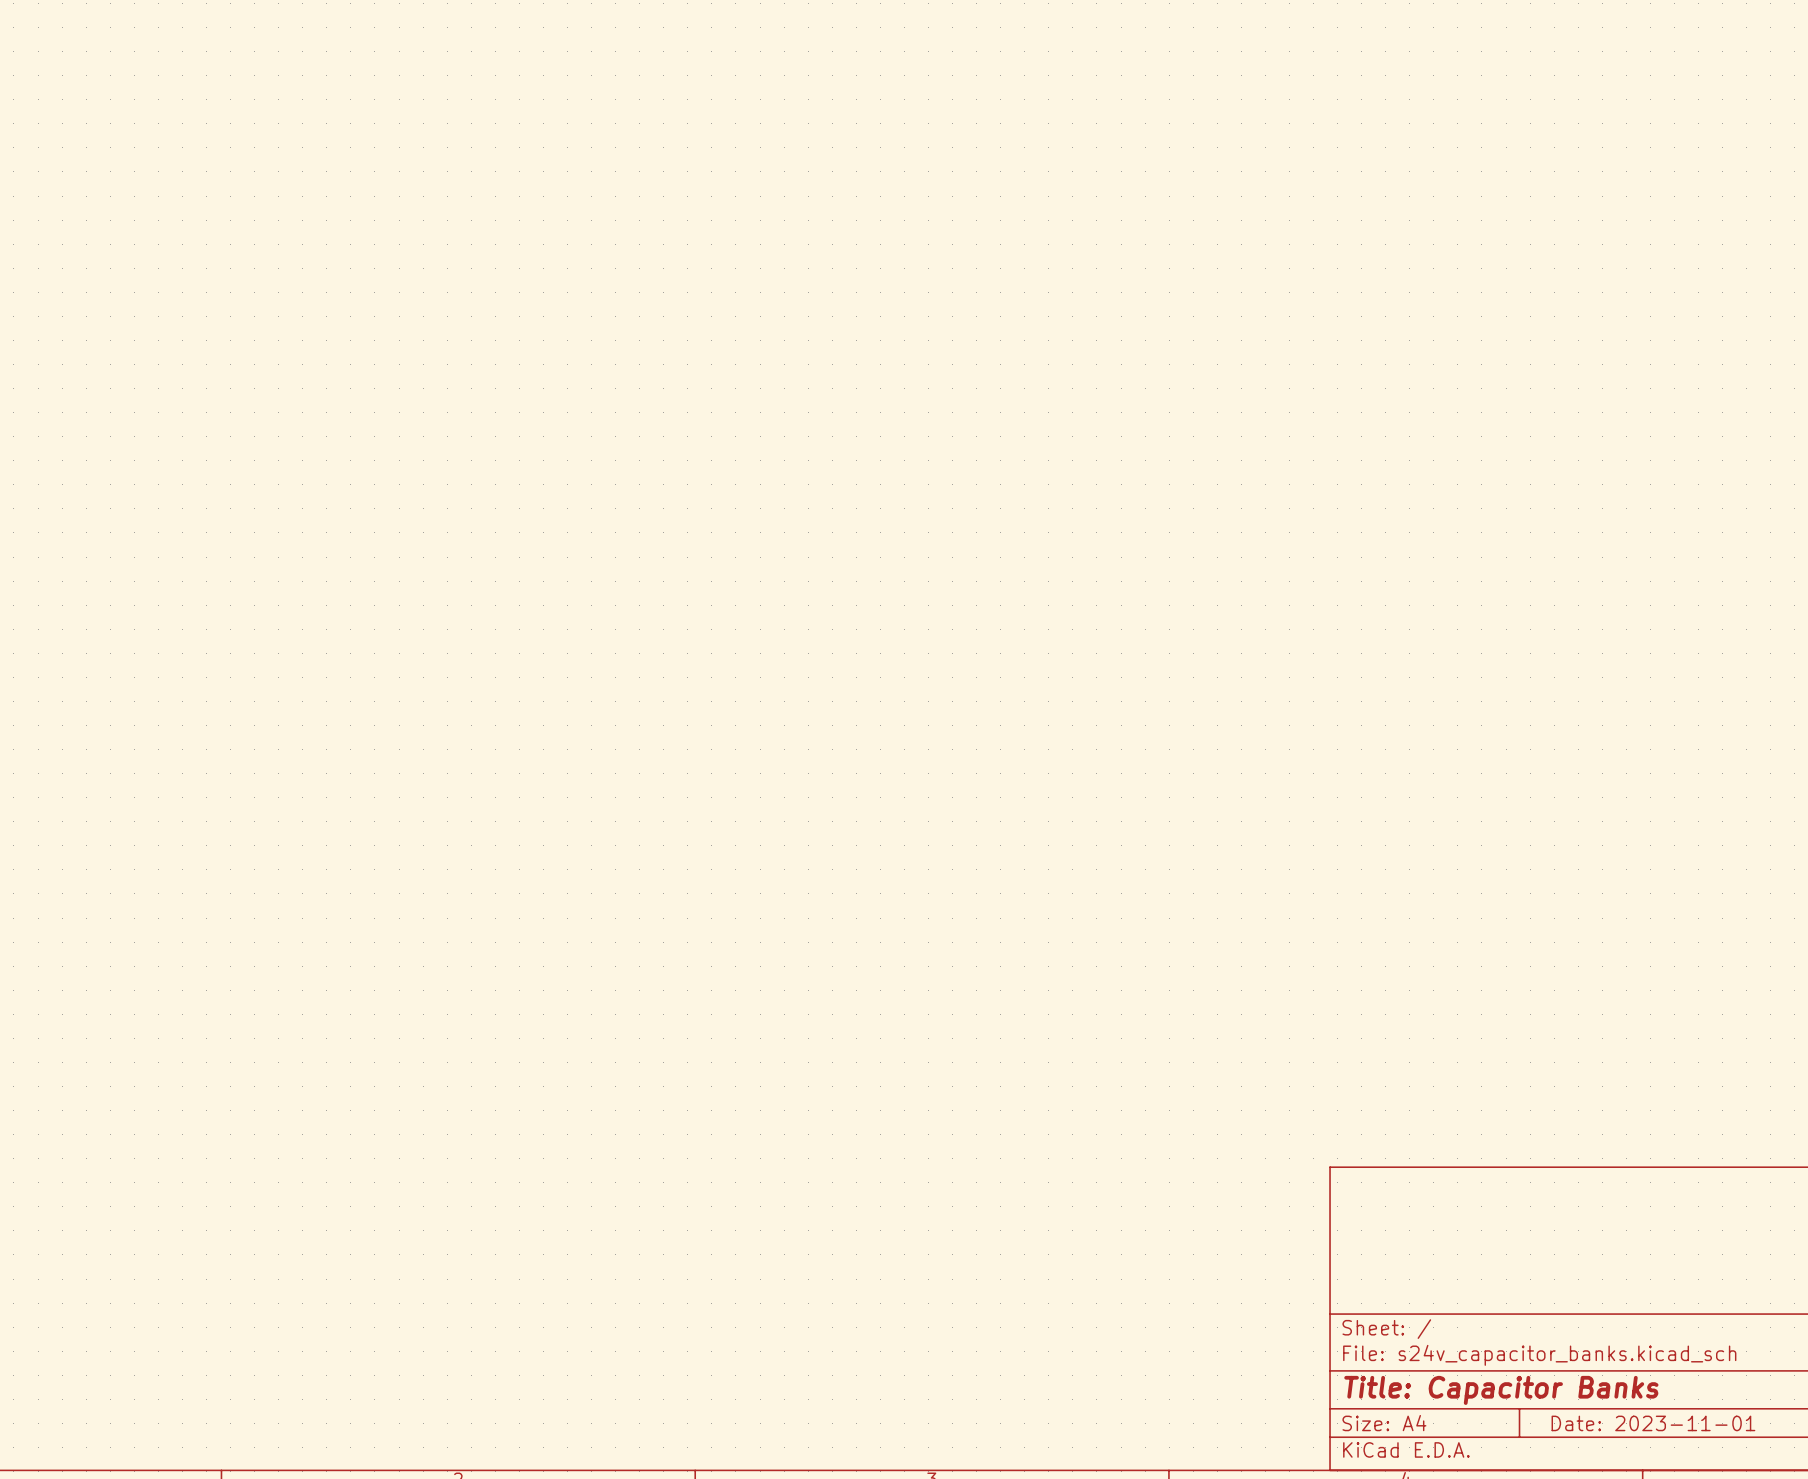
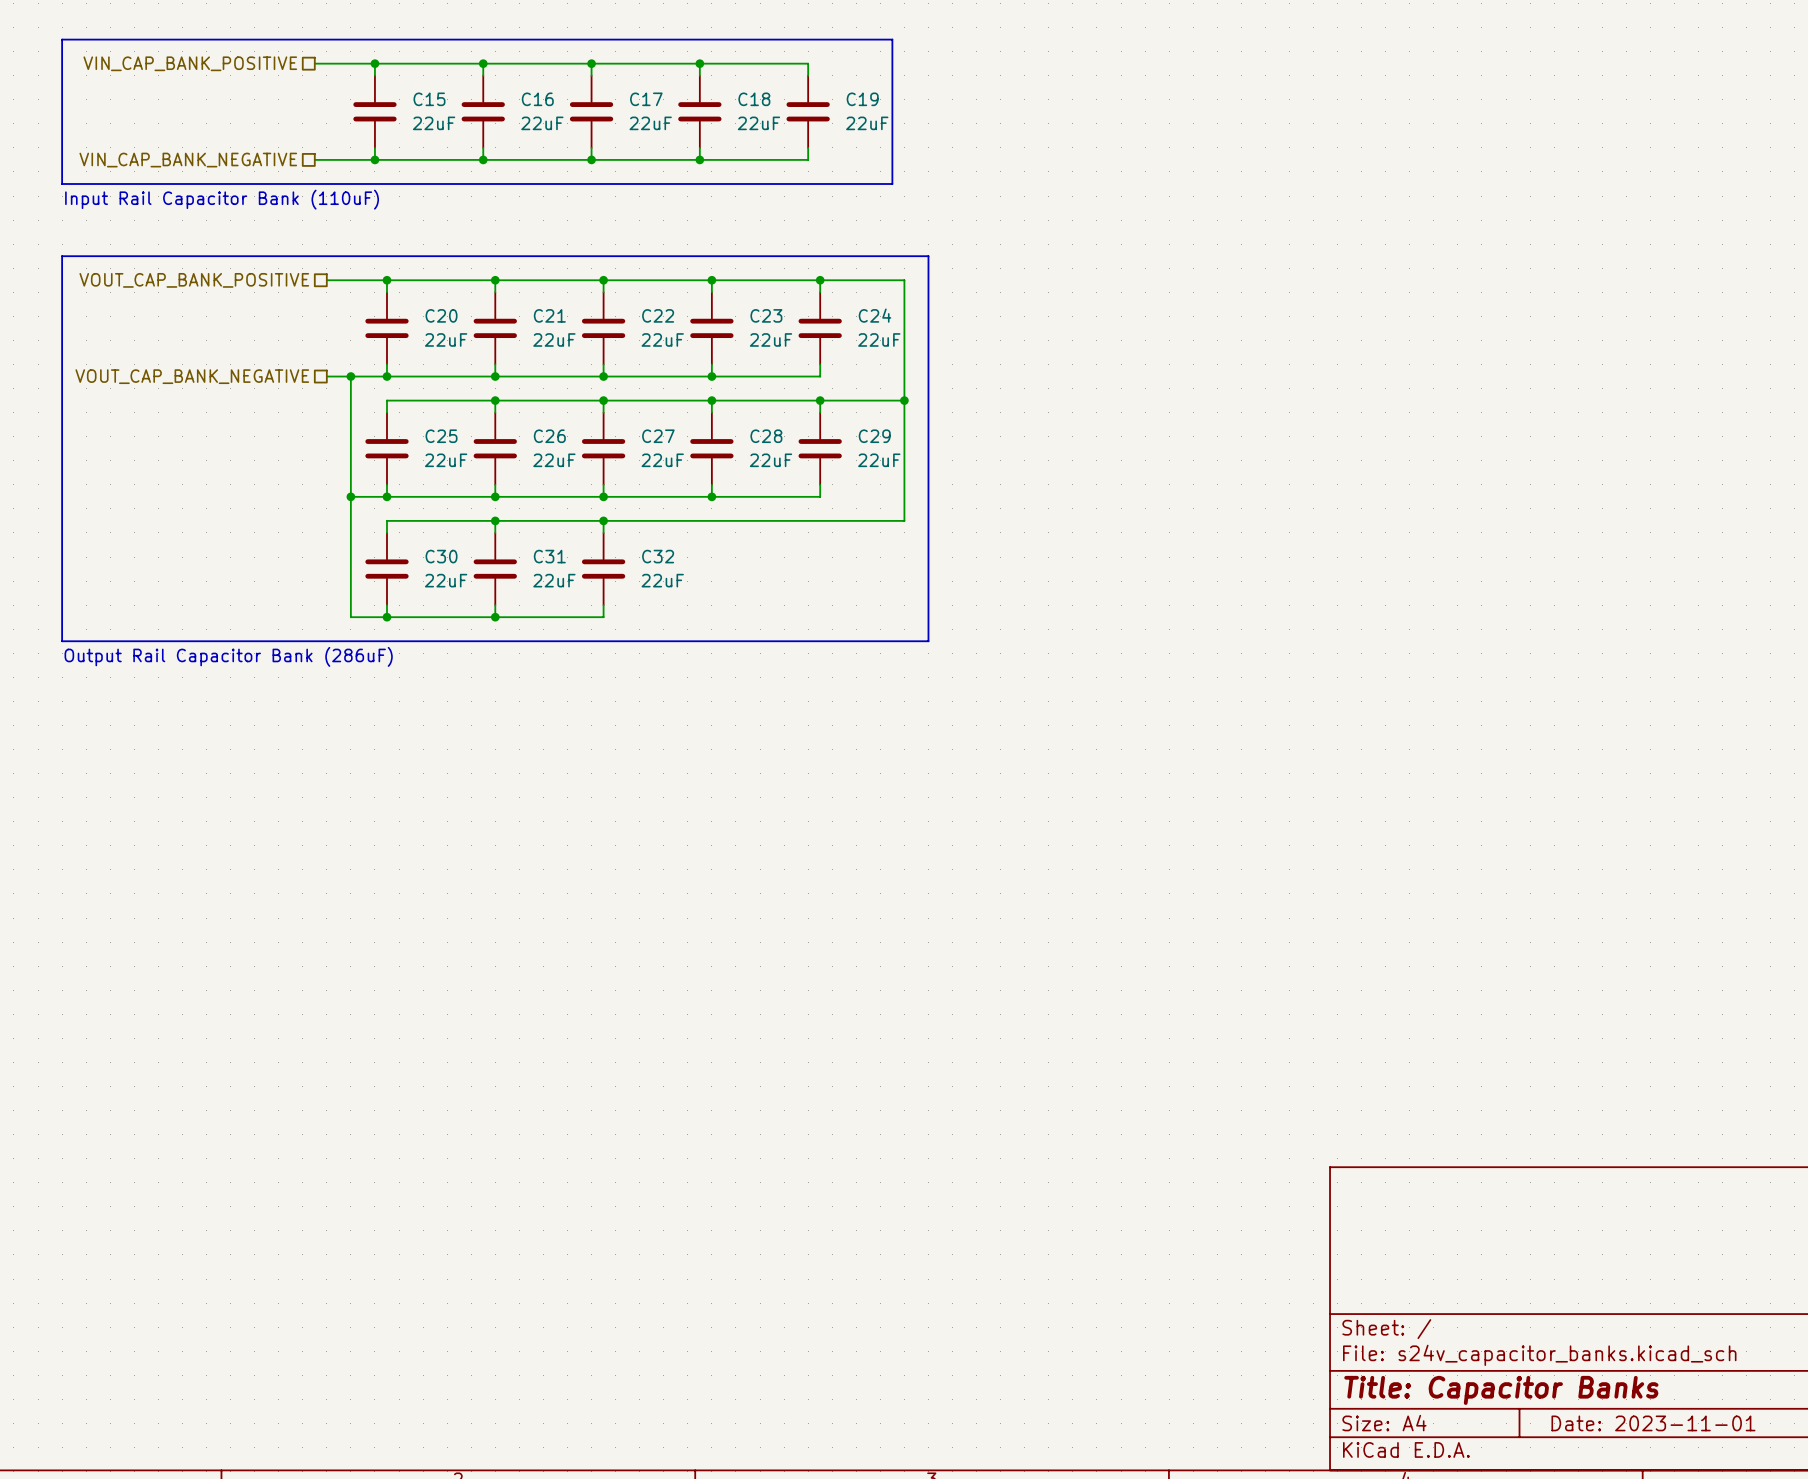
line: none -> (62, 39) (62, 183) (892, 183) (892, 39) (62, 39)
hierarchical label: none -> VIN_CAP_BANK_POSITIVE (190, 63)
wire: none -> (314, 63) (808, 63) (808, 75)
wire: none -> (374, 63) (374, 75)
junction: none -> (374, 63)
wire: none -> (483, 63) (483, 75)
junction: none -> (483, 63)
wire: none -> (591, 63) (591, 75)
junction: none -> (591, 63)
wire: none -> (699, 63) (699, 75)
junction: none -> (699, 63)
C15: none -> 22uF (374, 111)
C16: none -> 22uF (483, 111)
C17: none -> 22uF (591, 111)
C18: none -> 22uF (699, 111)
C19: none -> 22uF (808, 111)
wire: none -> (374, 147) (374, 159)
wire: none -> (483, 147) (483, 159)
wire: none -> (591, 147) (591, 159)
wire: none -> (699, 147) (699, 159)
wire: none -> (808, 147) (808, 159) (314, 159)
junction: none -> (374, 159)
junction: none -> (483, 159)
junction: none -> (591, 159)
junction: none -> (699, 159)
hierarchical label: none -> VIN_CAP_BANK_NEGATIVE (188, 160)
text: none -> Input Rail Capacitor Bank (110uF) (222, 199)
line: none -> (62, 256) (928, 256) (928, 641) (62, 641) (62, 256)
hierarchical label: none -> VOUT_CAP_BANK_POSITIVE (194, 280)
wire: none -> (326, 280) (904, 280) (904, 520) (386, 520) (386, 532)
wire: none -> (386, 280) (386, 292)
junction: none -> (386, 280)
wire: none -> (495, 280) (495, 292)
junction: none -> (495, 280)
wire: none -> (603, 280) (603, 292)
junction: none -> (603, 280)
wire: none -> (711, 280) (711, 292)
junction: none -> (711, 280)
wire: none -> (820, 280) (820, 292)
junction: none -> (820, 280)
C20: none -> 22uF (386, 328)
C21: none -> 22uF (495, 328)
C22: none -> 22uF (603, 328)
C23: none -> 22uF (711, 328)
C24: none -> 22uF (820, 328)
wire: none -> (386, 364) (386, 376)
wire: none -> (495, 364) (495, 376)
wire: none -> (603, 364) (603, 376)
wire: none -> (711, 364) (711, 376)
wire: none -> (820, 364) (820, 376) (326, 376)
hierarchical label: none -> VOUT_CAP_BANK_NEGATIVE (192, 376)
wire: none -> (350, 376) (350, 617) (603, 617) (603, 605)
junction: none -> (350, 376)
junction: none -> (386, 376)
junction: none -> (495, 376)
junction: none -> (603, 376)
junction: none -> (711, 376)
wire: none -> (495, 400) (495, 412)
junction: none -> (495, 400)
wire: none -> (603, 400) (603, 412)
junction: none -> (603, 400)
wire: none -> (711, 400) (711, 412)
junction: none -> (711, 400)
wire: none -> (820, 400) (820, 412)
junction: none -> (820, 400)
wire: none -> (904, 400) (386, 400) (386, 412)
junction: none -> (904, 400)
C25: none -> 22uF (386, 448)
C26: none -> 22uF (495, 448)
C27: none -> 22uF (603, 448)
C28: none -> 22uF (711, 448)
C29: none -> 22uF (820, 448)
wire: none -> (386, 484) (386, 496)
wire: none -> (495, 484) (495, 496)
wire: none -> (603, 484) (603, 496)
wire: none -> (711, 484) (711, 496)
wire: none -> (820, 484) (820, 496) (350, 496)
junction: none -> (350, 496)
junction: none -> (386, 496)
junction: none -> (495, 496)
junction: none -> (603, 496)
junction: none -> (711, 496)
wire: none -> (495, 520) (495, 532)
junction: none -> (495, 520)
wire: none -> (603, 520) (603, 532)
junction: none -> (603, 520)
C30: none -> 22uF (386, 569)
C31: none -> 22uF (495, 569)
C32: none -> 22uF (603, 569)
wire: none -> (386, 605) (386, 617)
wire: none -> (495, 605) (495, 617)
junction: none -> (386, 617)
junction: none -> (495, 617)
text: none -> Output Rail Capacitor Bank (286uF) (228, 656)

